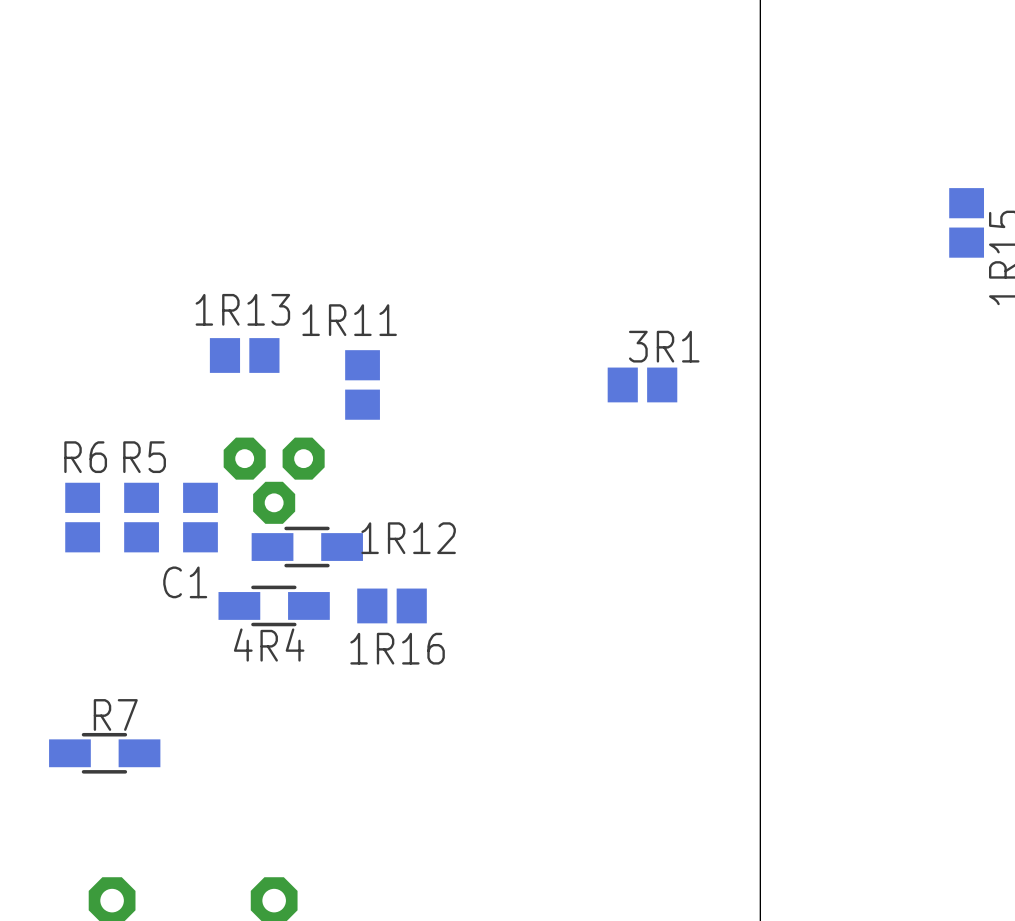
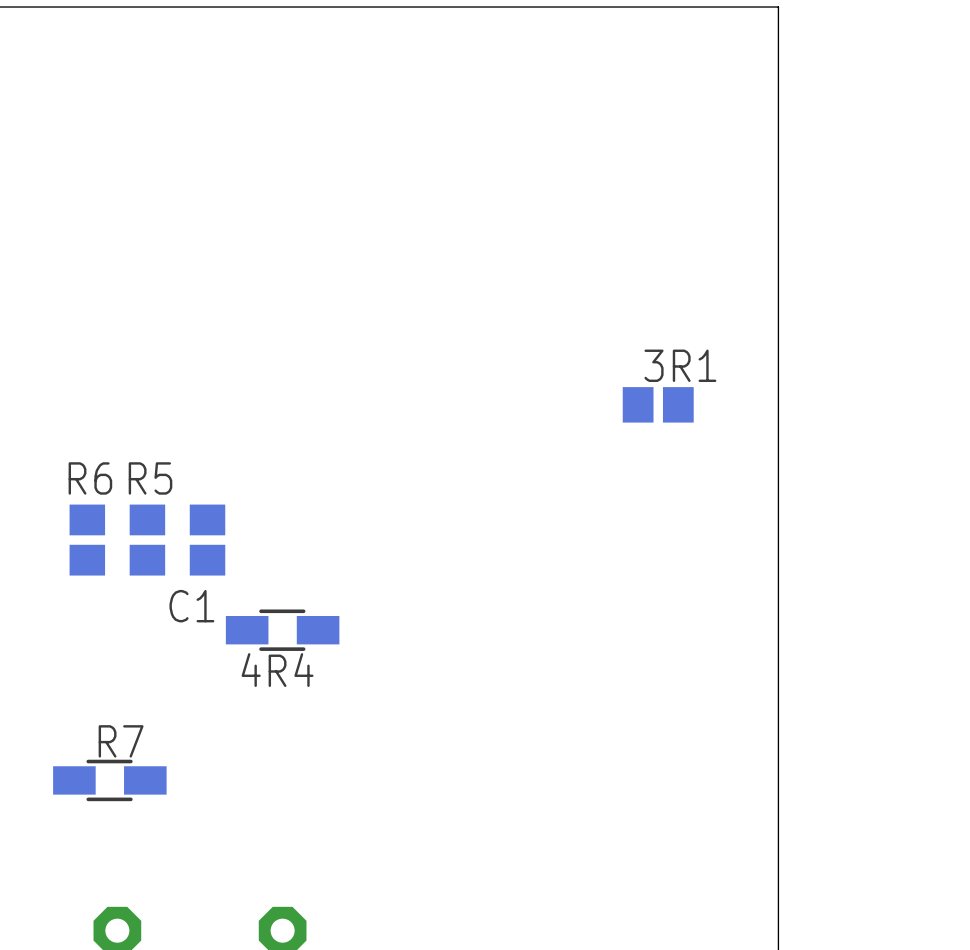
1R13: (244, 355) -> none
1R11: (362, 384) -> none
part: (274, 480) -> none
1R12: (307, 547) -> none
1R16: (392, 605) -> none

